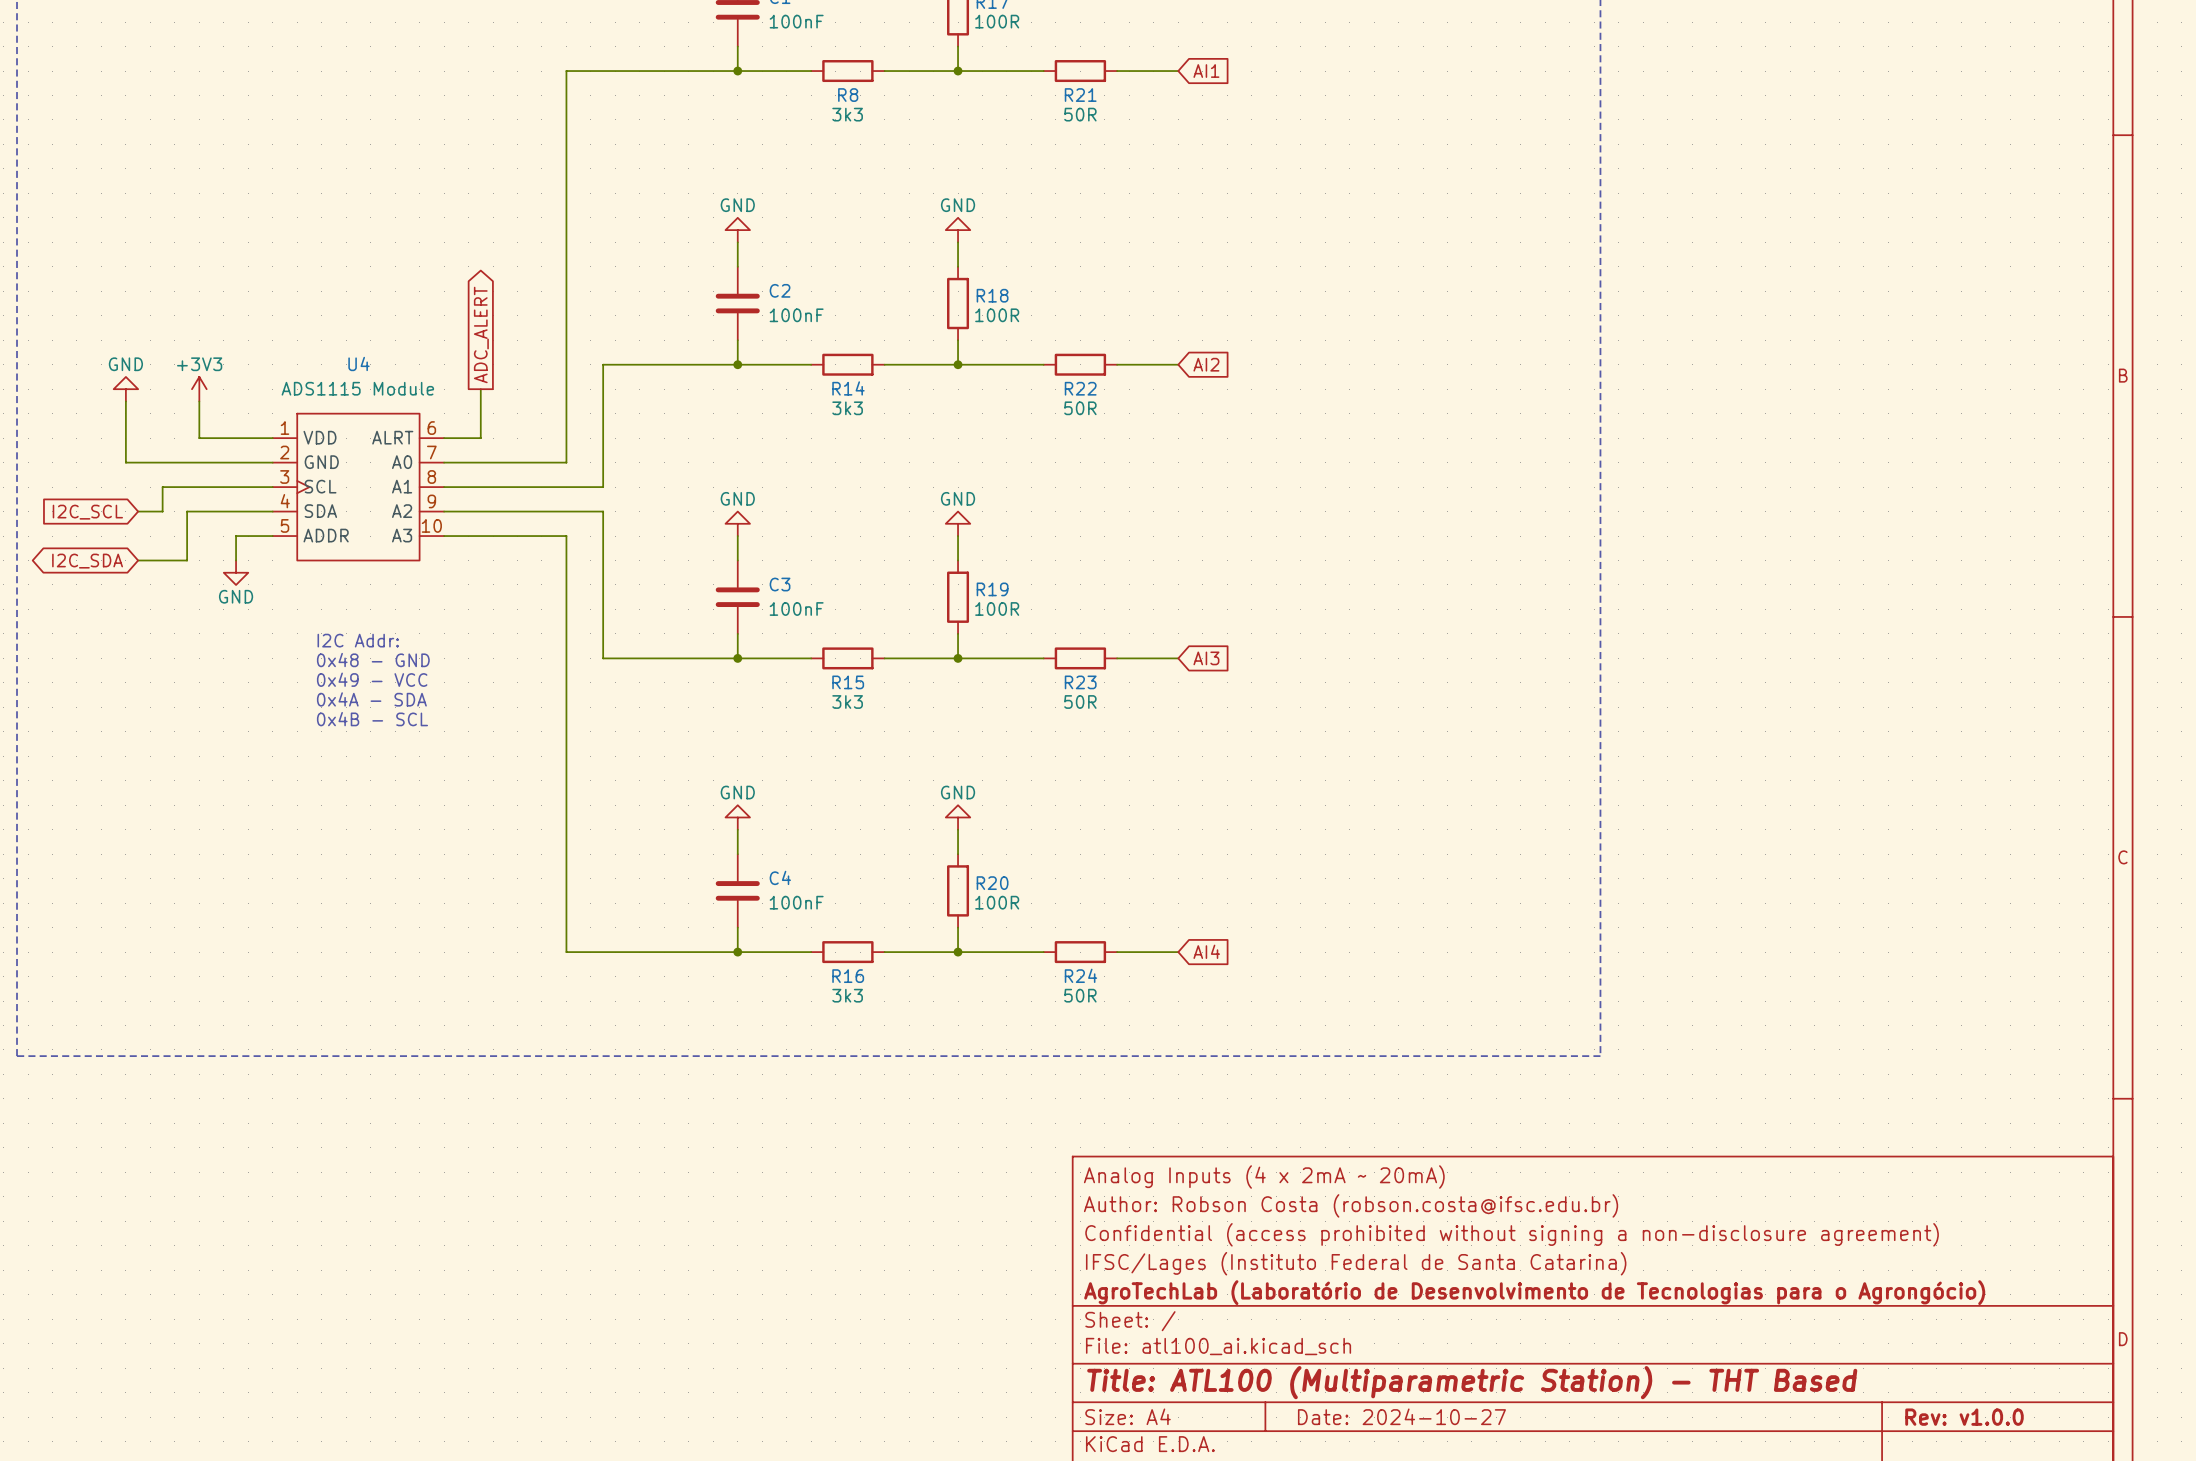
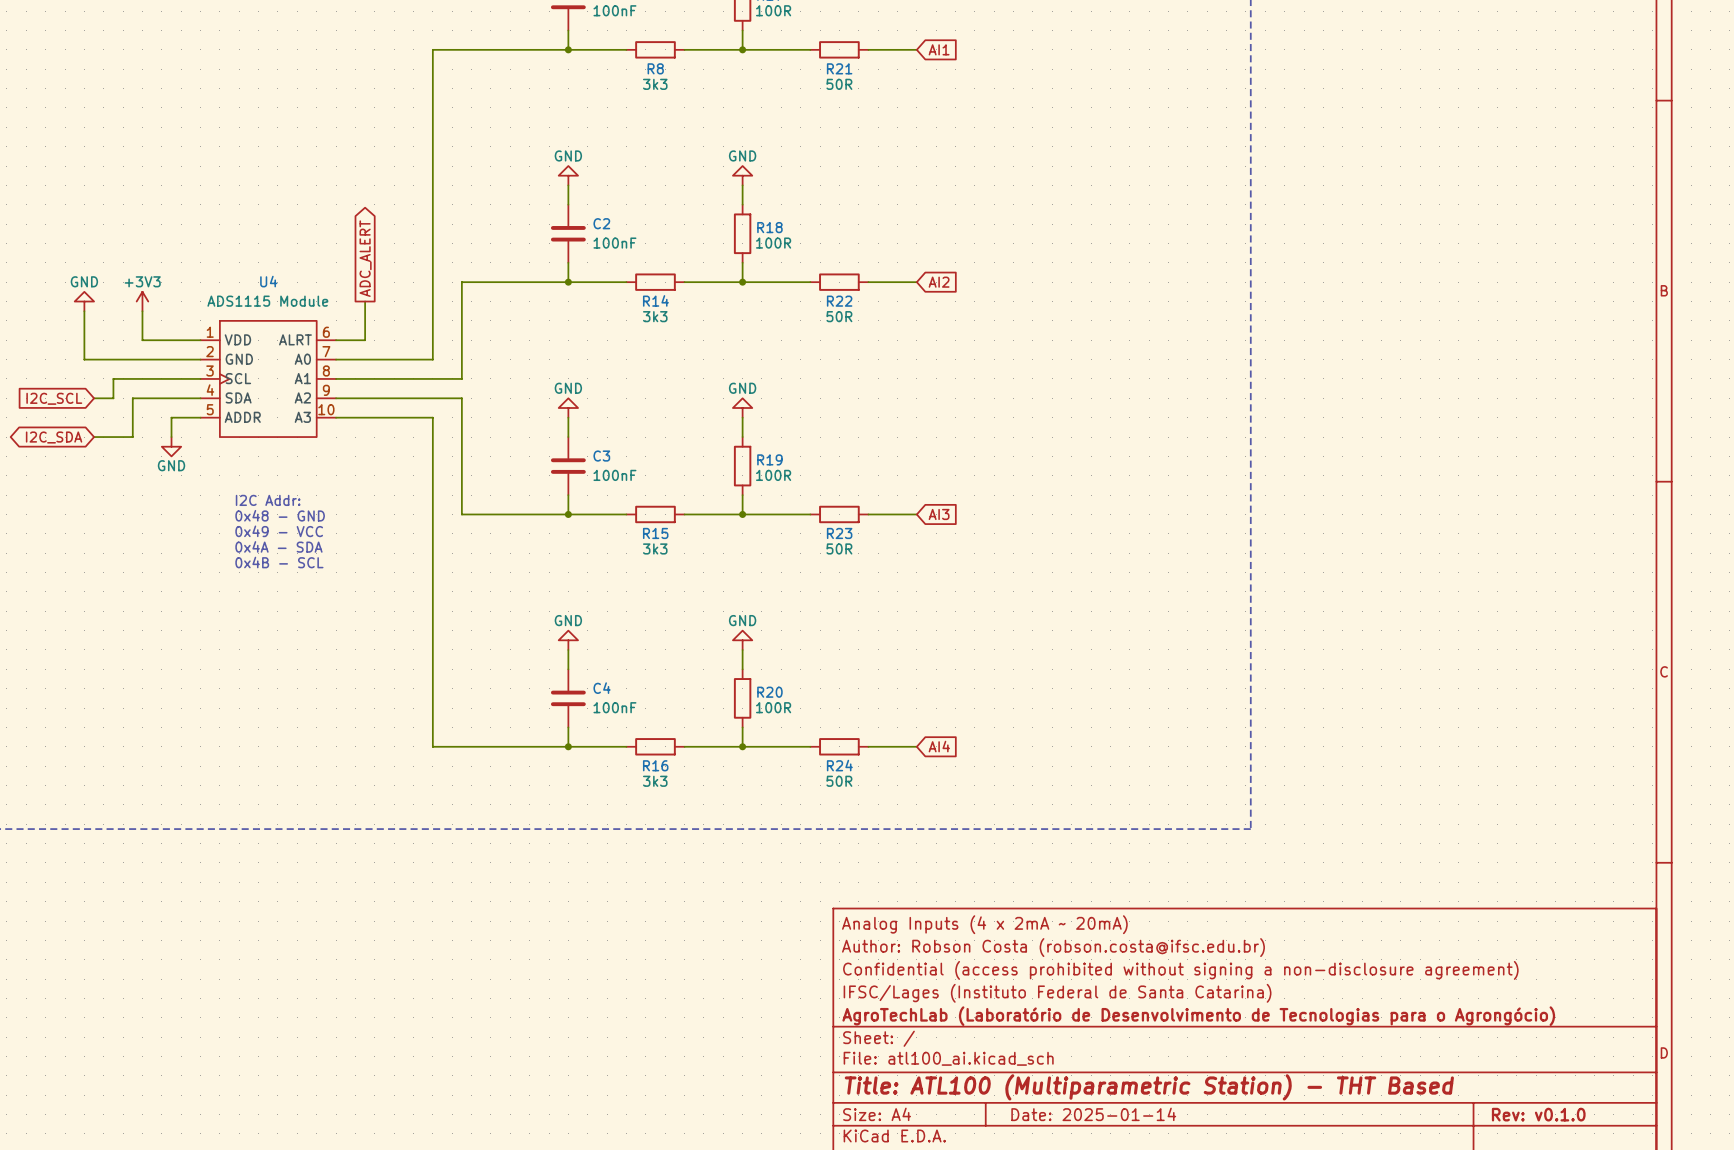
title block: Date: 2024-10-27 (1401, 1416) -> Date: 2025-01-14 (1093, 1114)
title block: Rev: v1.0.0 (1964, 1417) -> Rev: v0.1.0 (1538, 1114)

